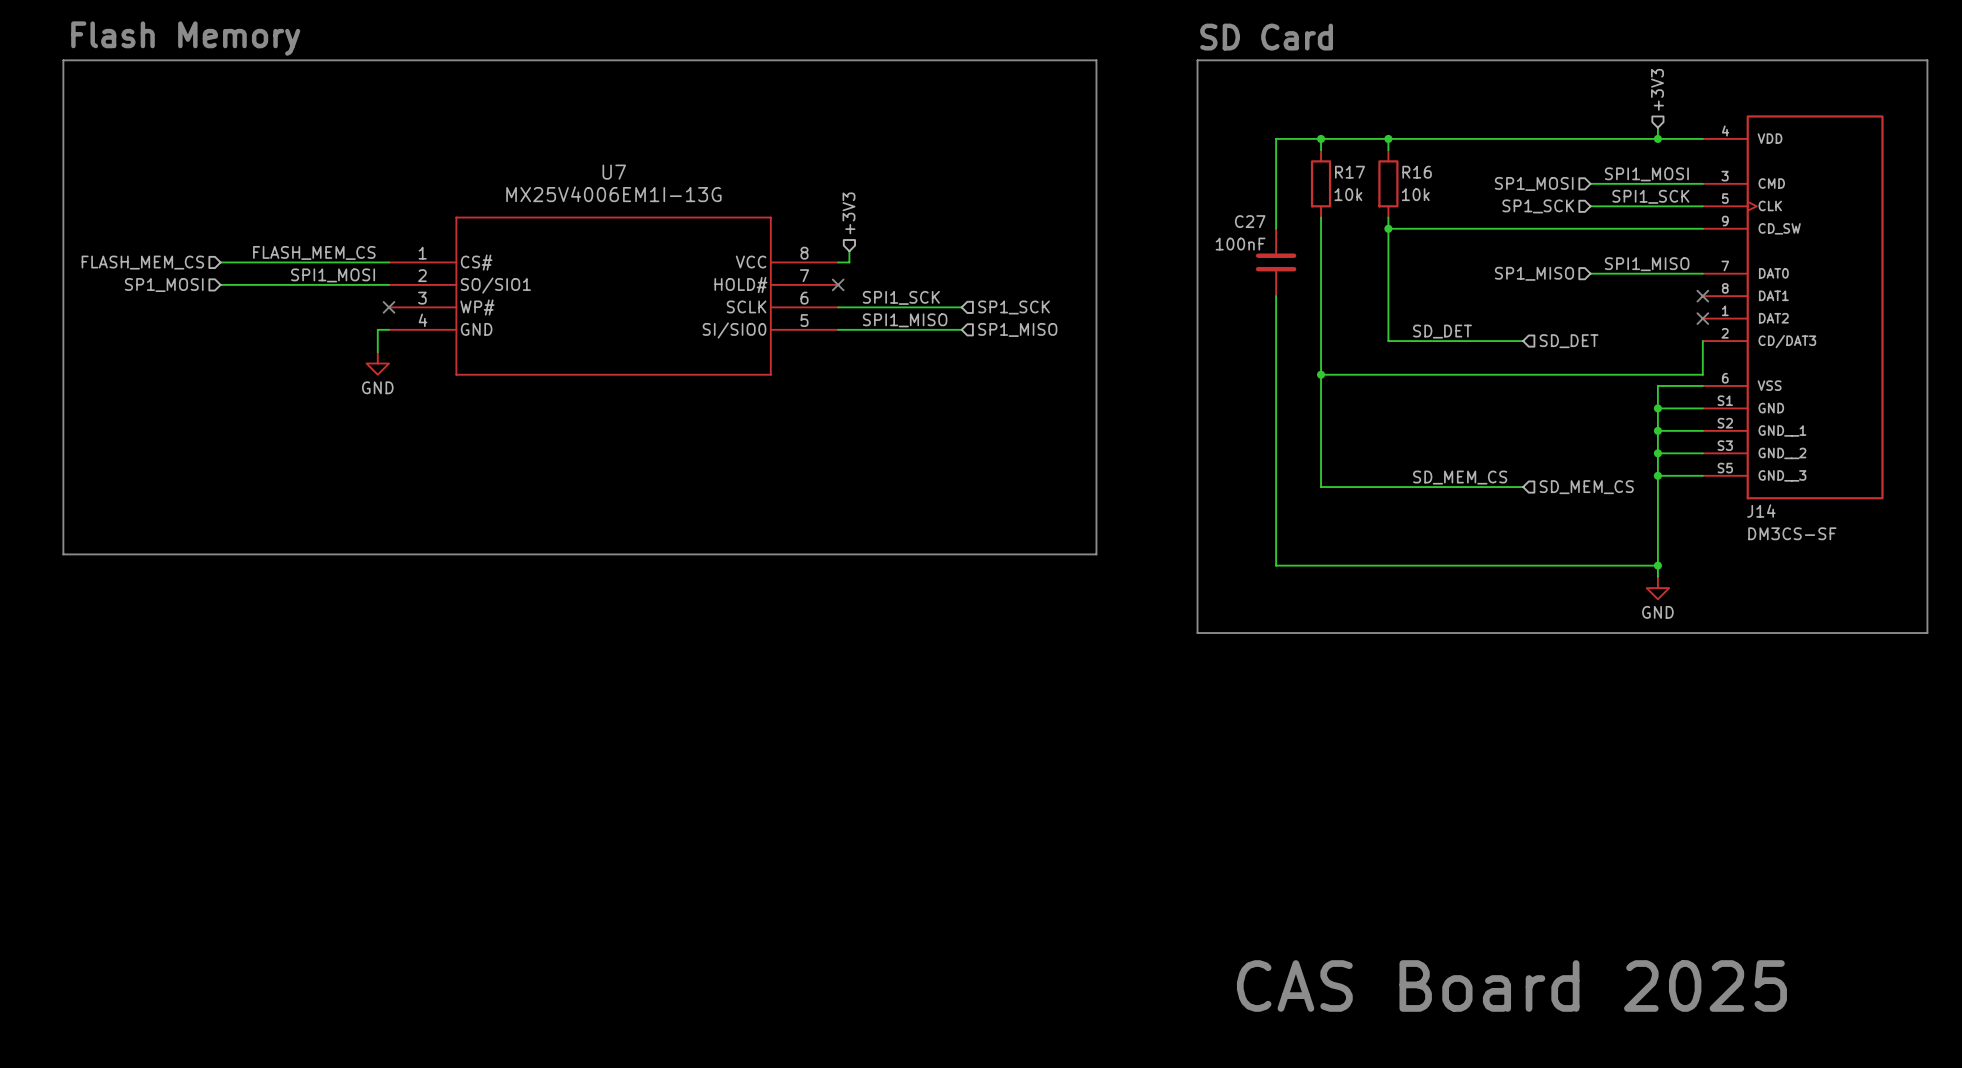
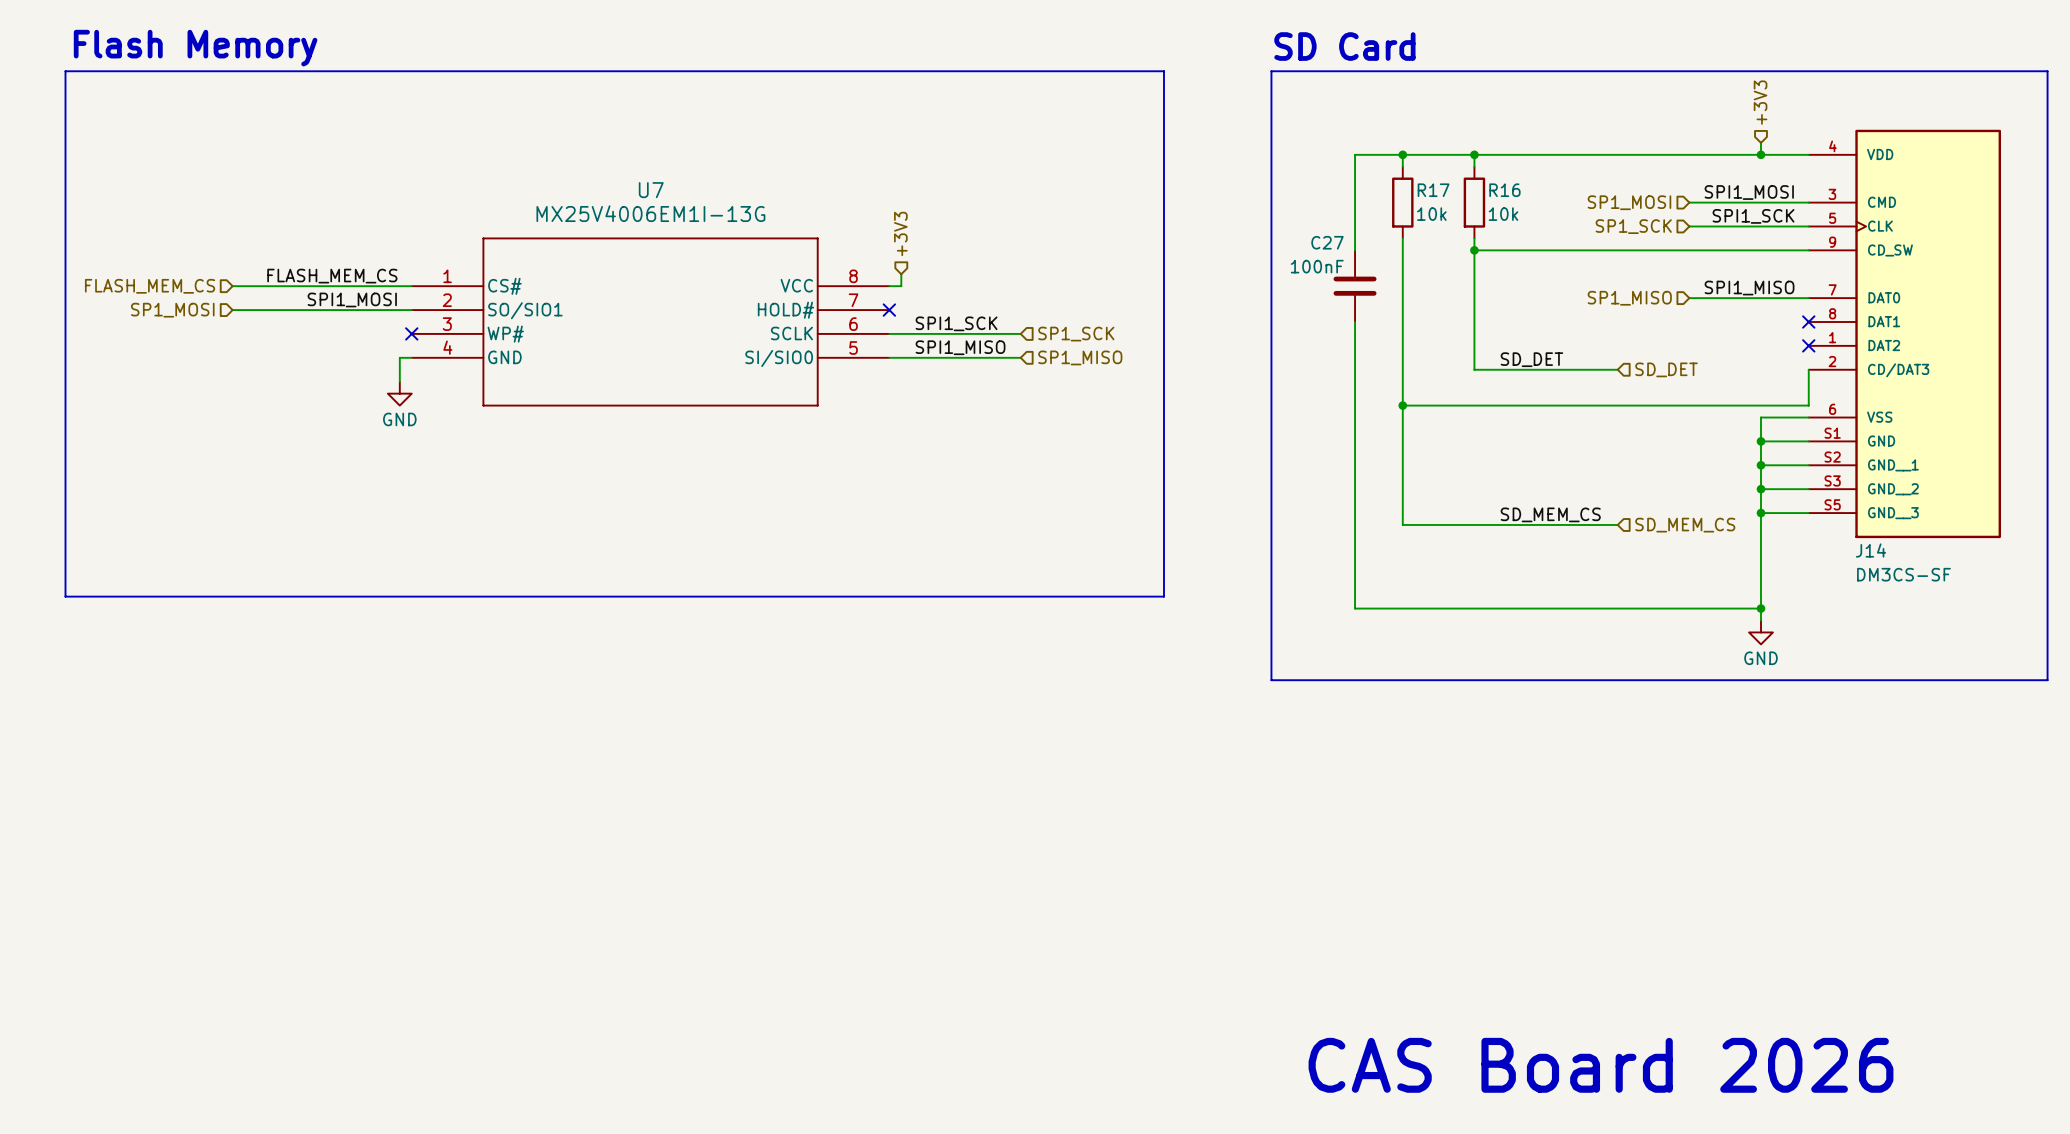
text: CAS Board 2025 (1511, 985) -> CAS Board 2026 (1601, 1065)

